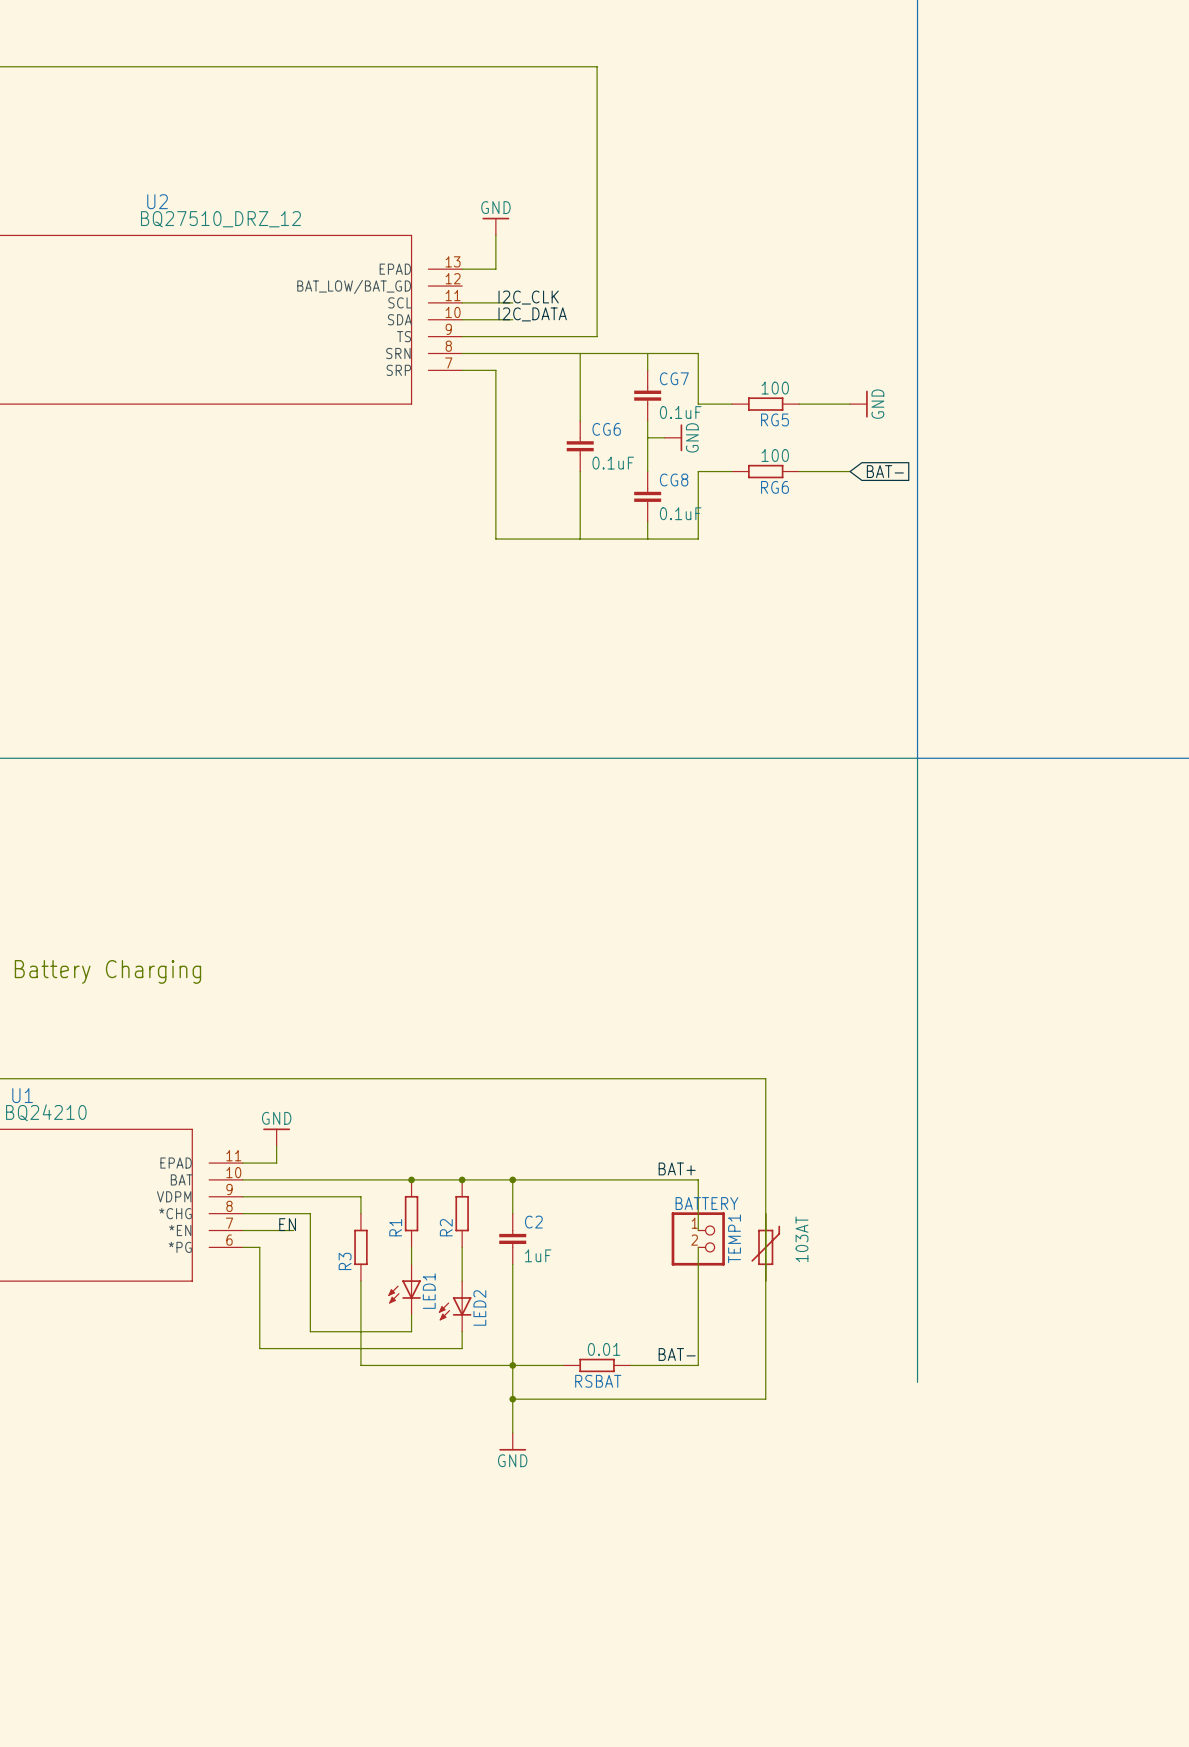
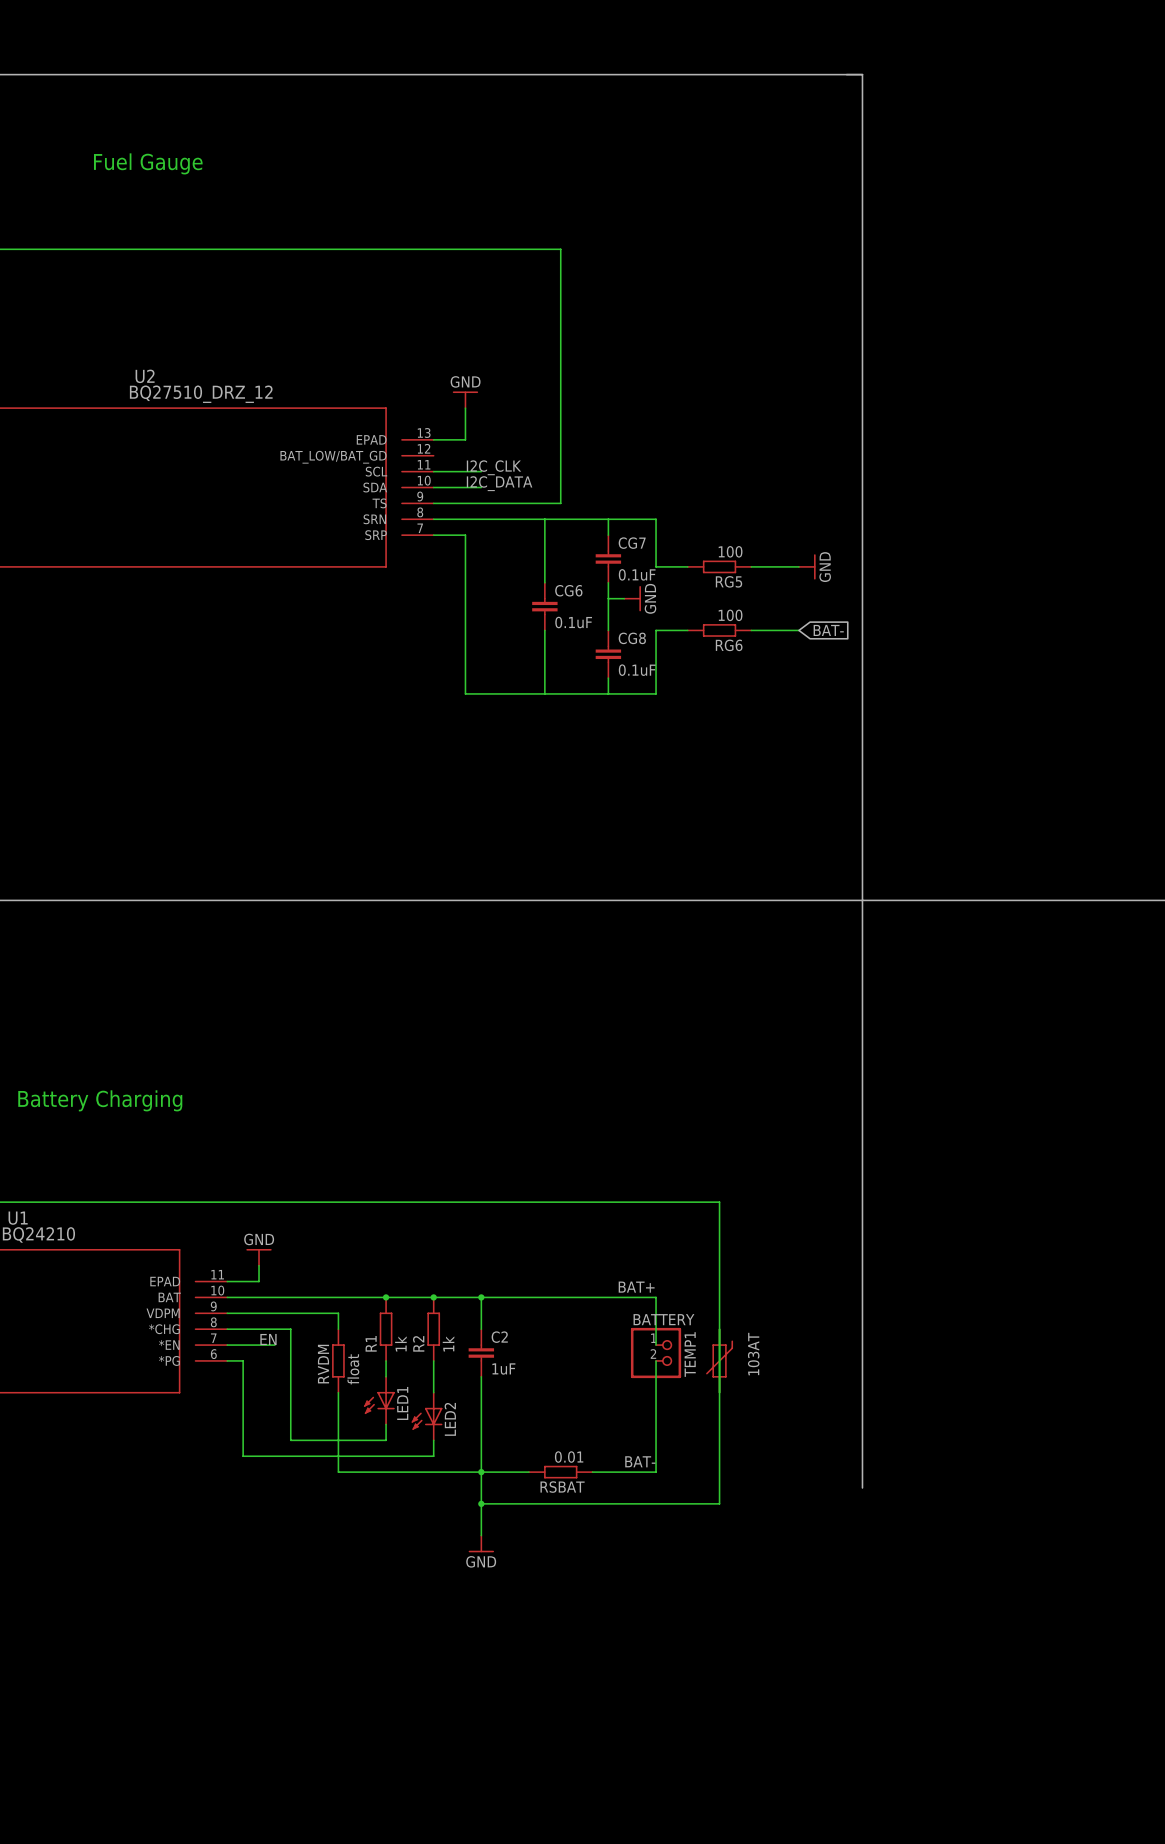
R1 value: none -> 1k (400, 1343)
R2 value: none -> 1k (448, 1343)
R3 value: none -> float (353, 1369)
R3 name: R3 (345, 1261) -> RVDM (323, 1364)

